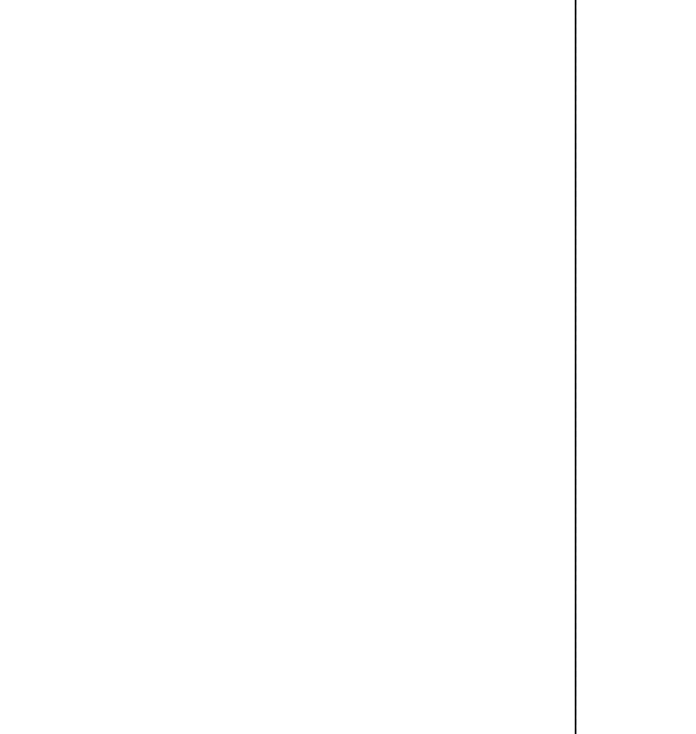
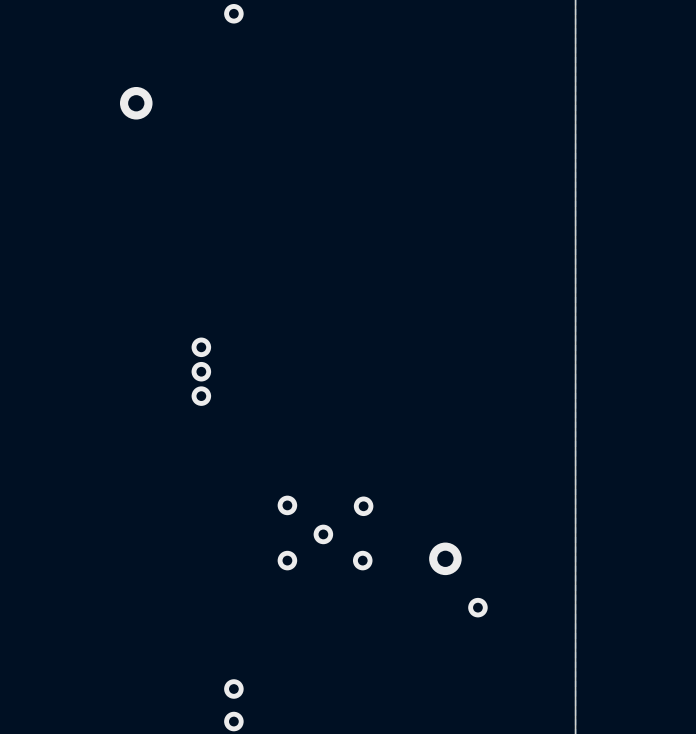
via: none -> (233, 13)
via: none -> (136, 103)
via: none -> (201, 347)
via: none -> (201, 371)
via: none -> (201, 396)
via: none -> (287, 505)
via: none -> (363, 506)
via: none -> (323, 534)
via: none -> (445, 558)
via: none -> (287, 560)
via: none -> (362, 560)
via: none -> (477, 607)
via: none -> (233, 688)
via: none -> (233, 721)

